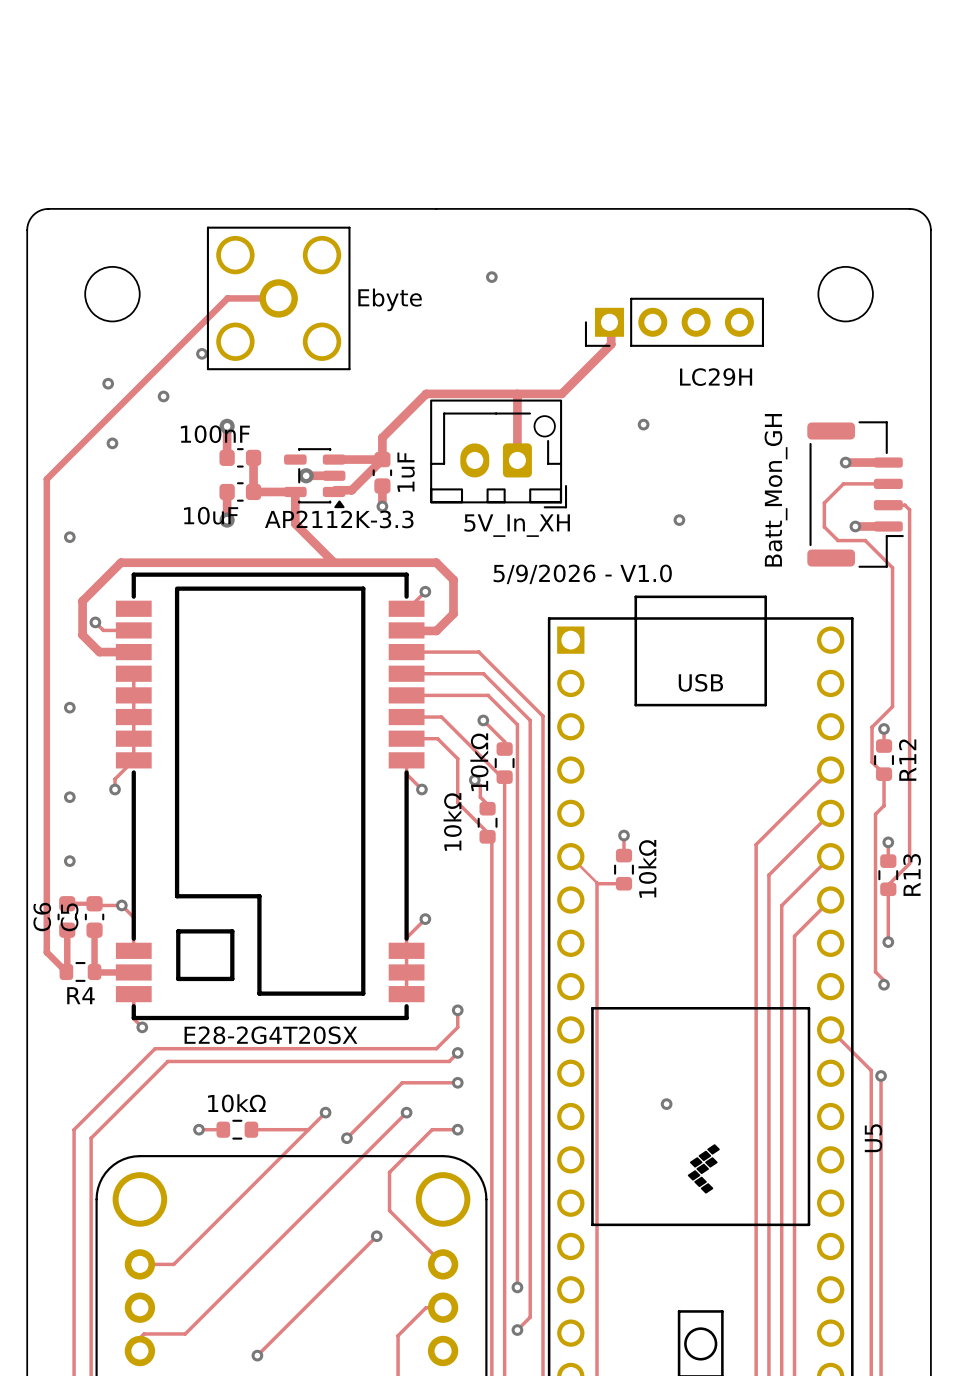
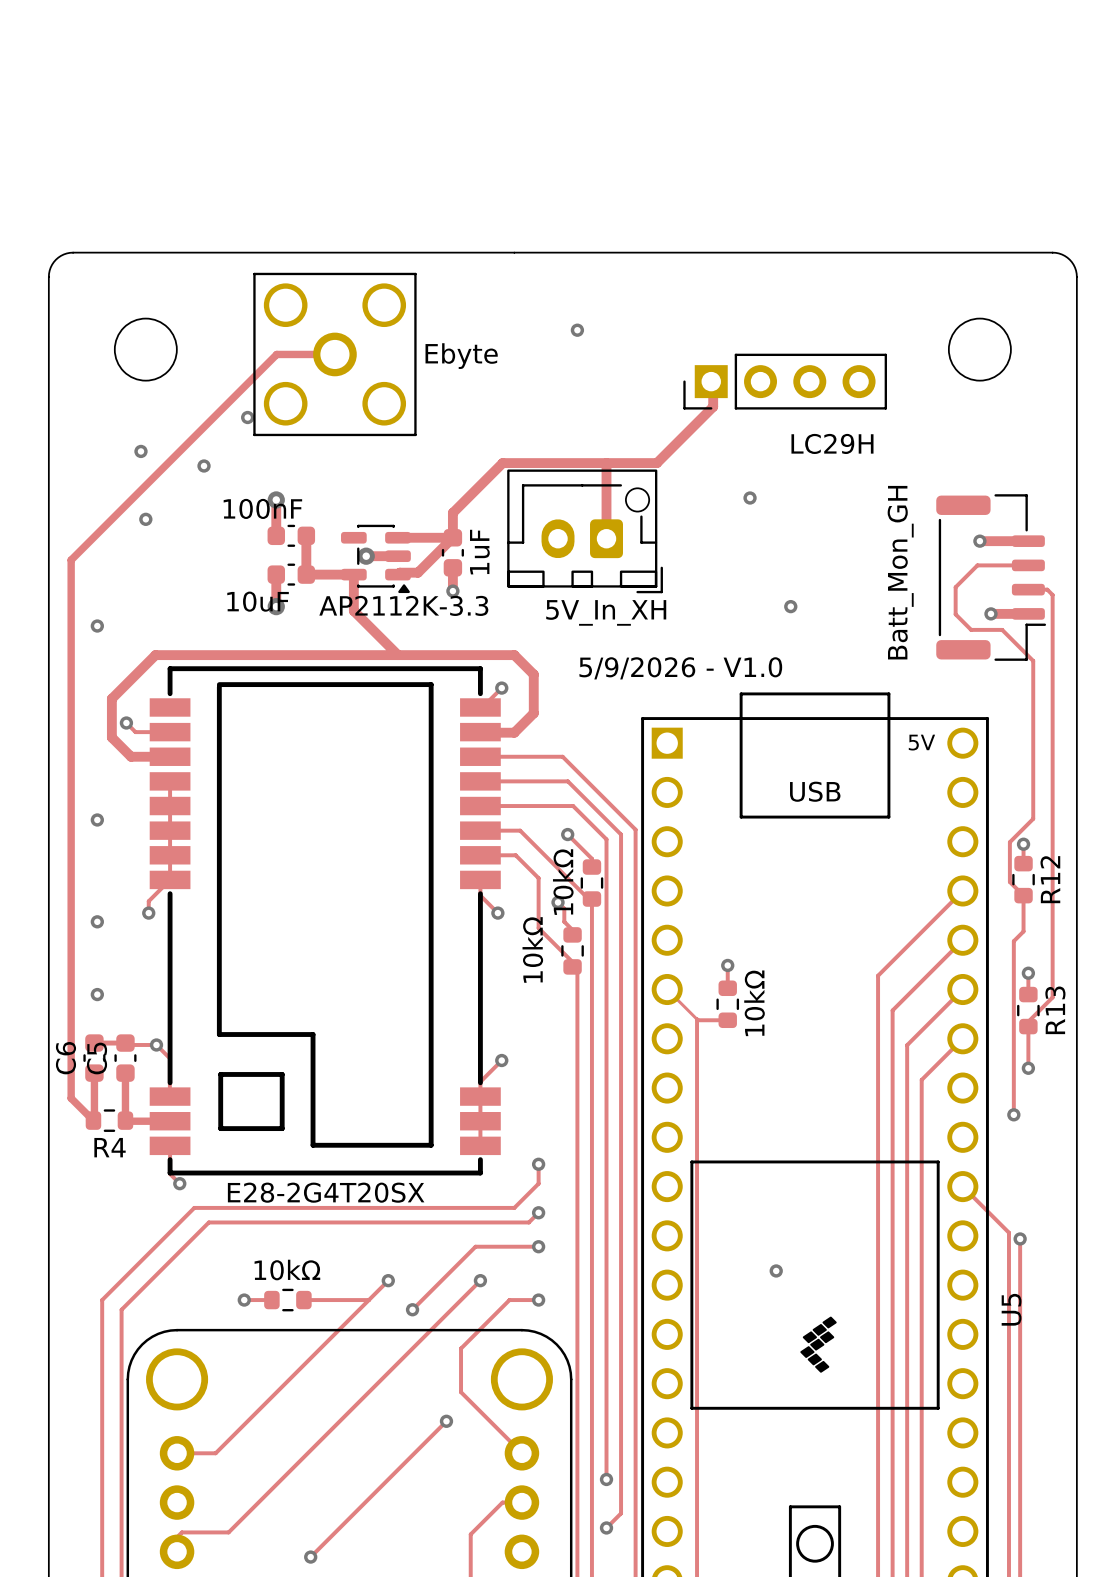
U5 text: none -> 5V (921, 742)
track: (888, 925) (888, 942) -> none
via: none -> (1028, 1068)
via: (888, 942) -> none
track: (875, 966) (875, 971) (884, 980) (884, 984) -> none
via: none -> (1013, 1114)
via: (884, 984) -> none

